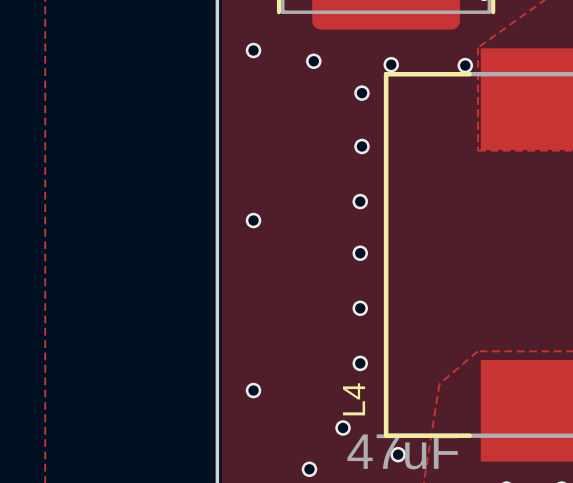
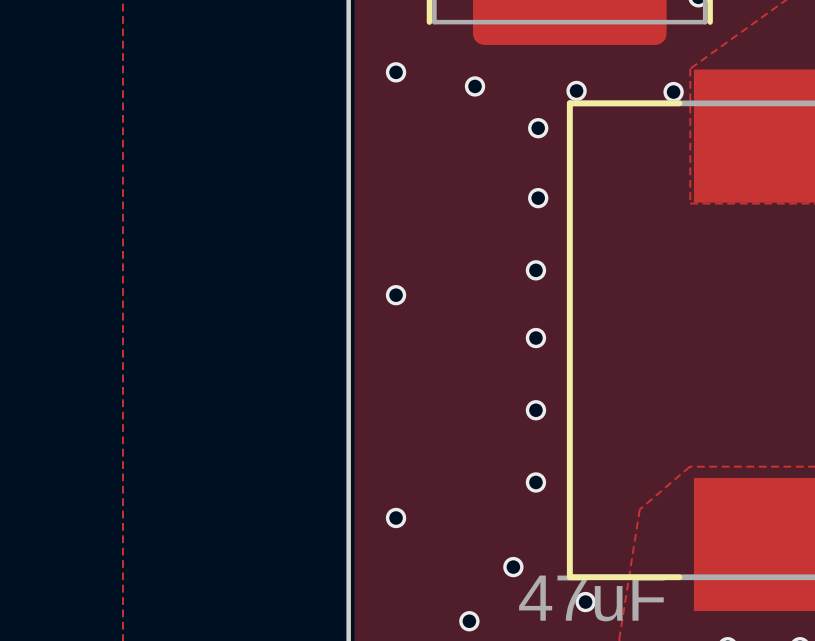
L4 name: L4 (354, 399) -> none

